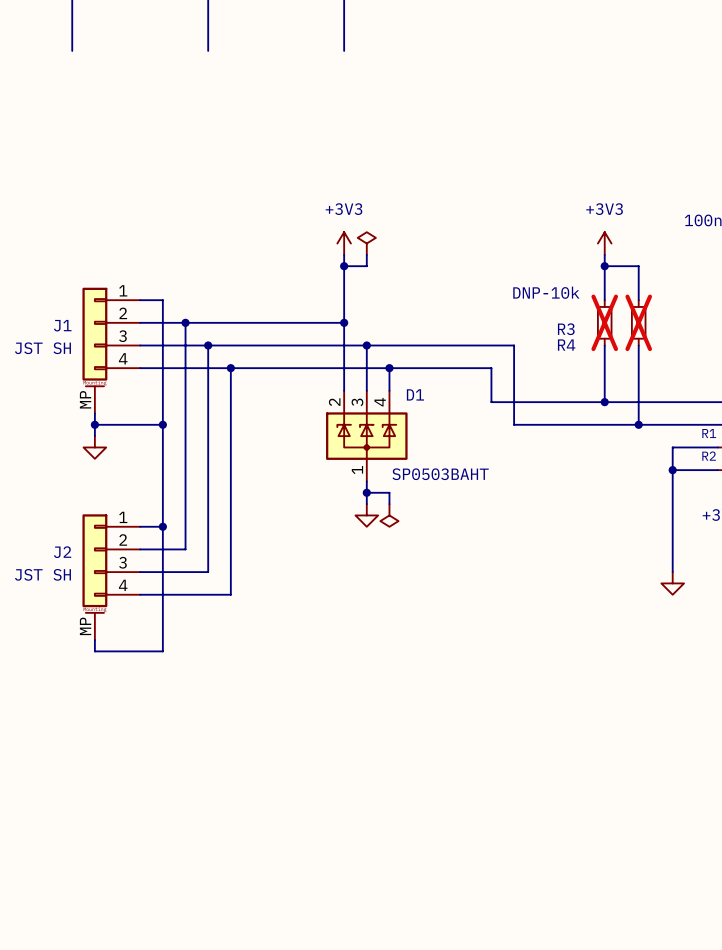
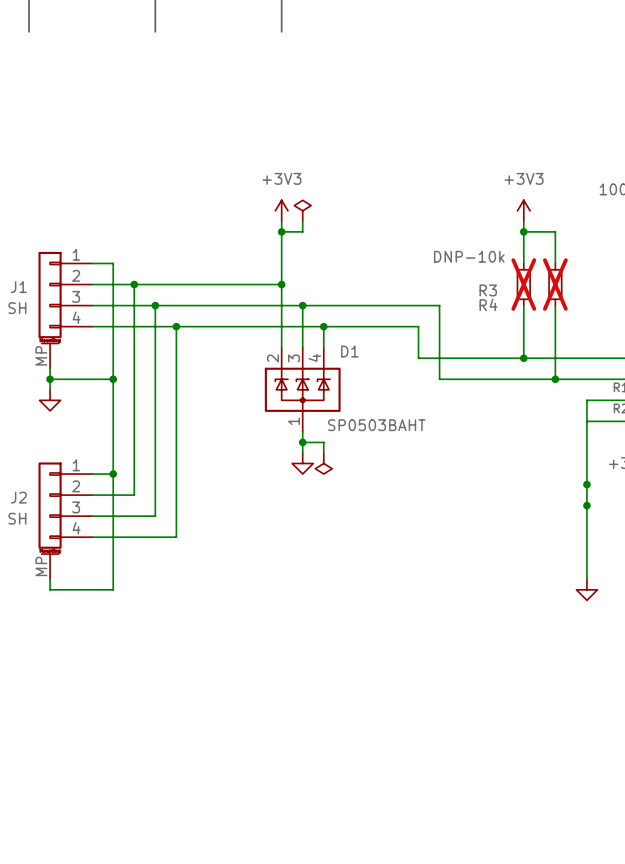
junction: (672, 470) -> none
junction: none -> (586, 484)
junction: none -> (586, 505)
wire: none -> (586, 516) (586, 579)
power symbol position: (672, 583) -> (586, 589)

